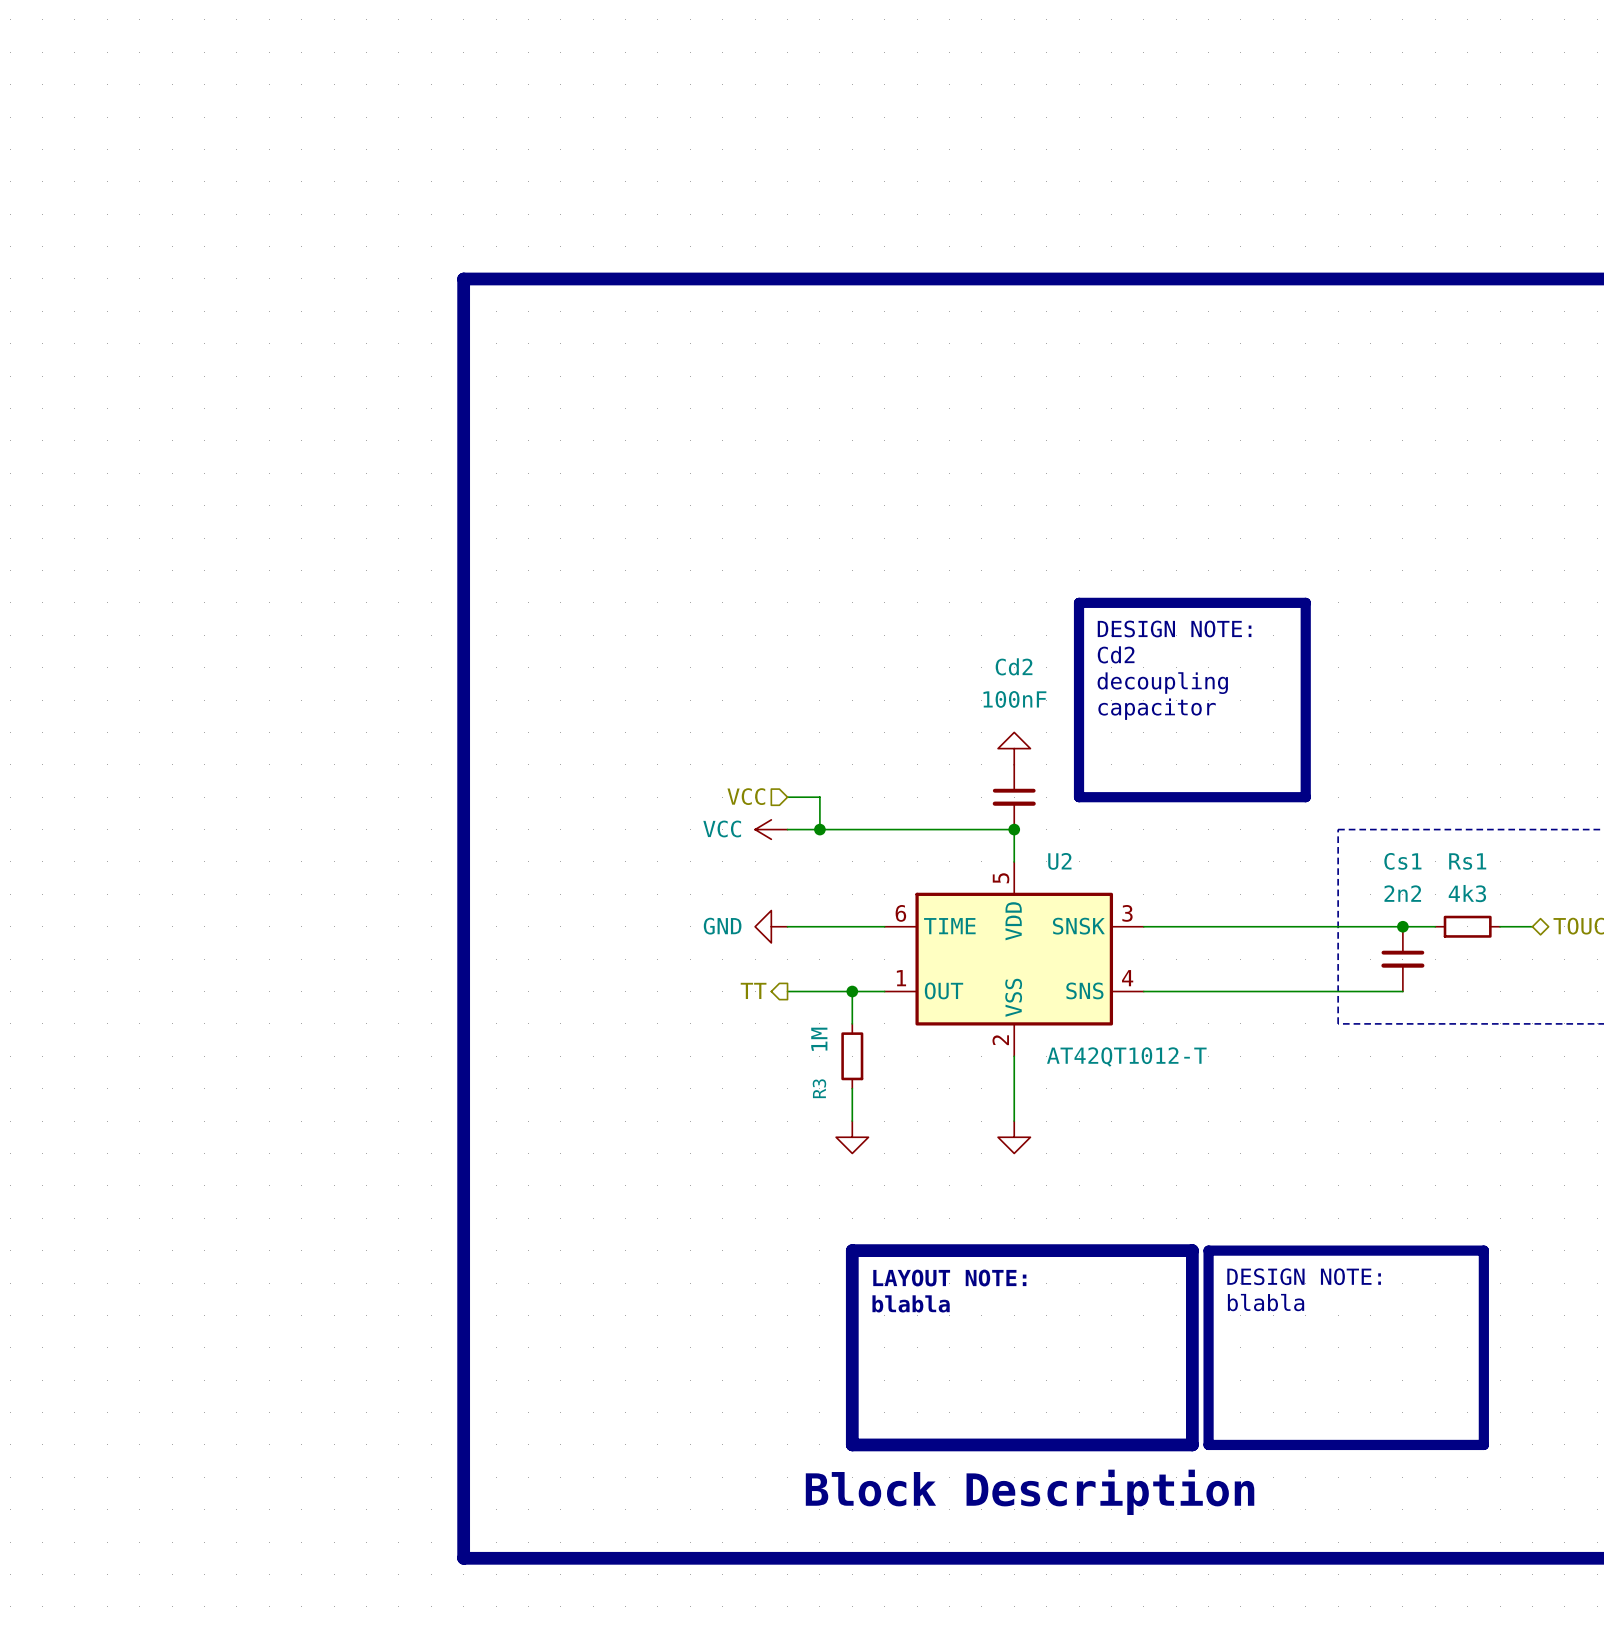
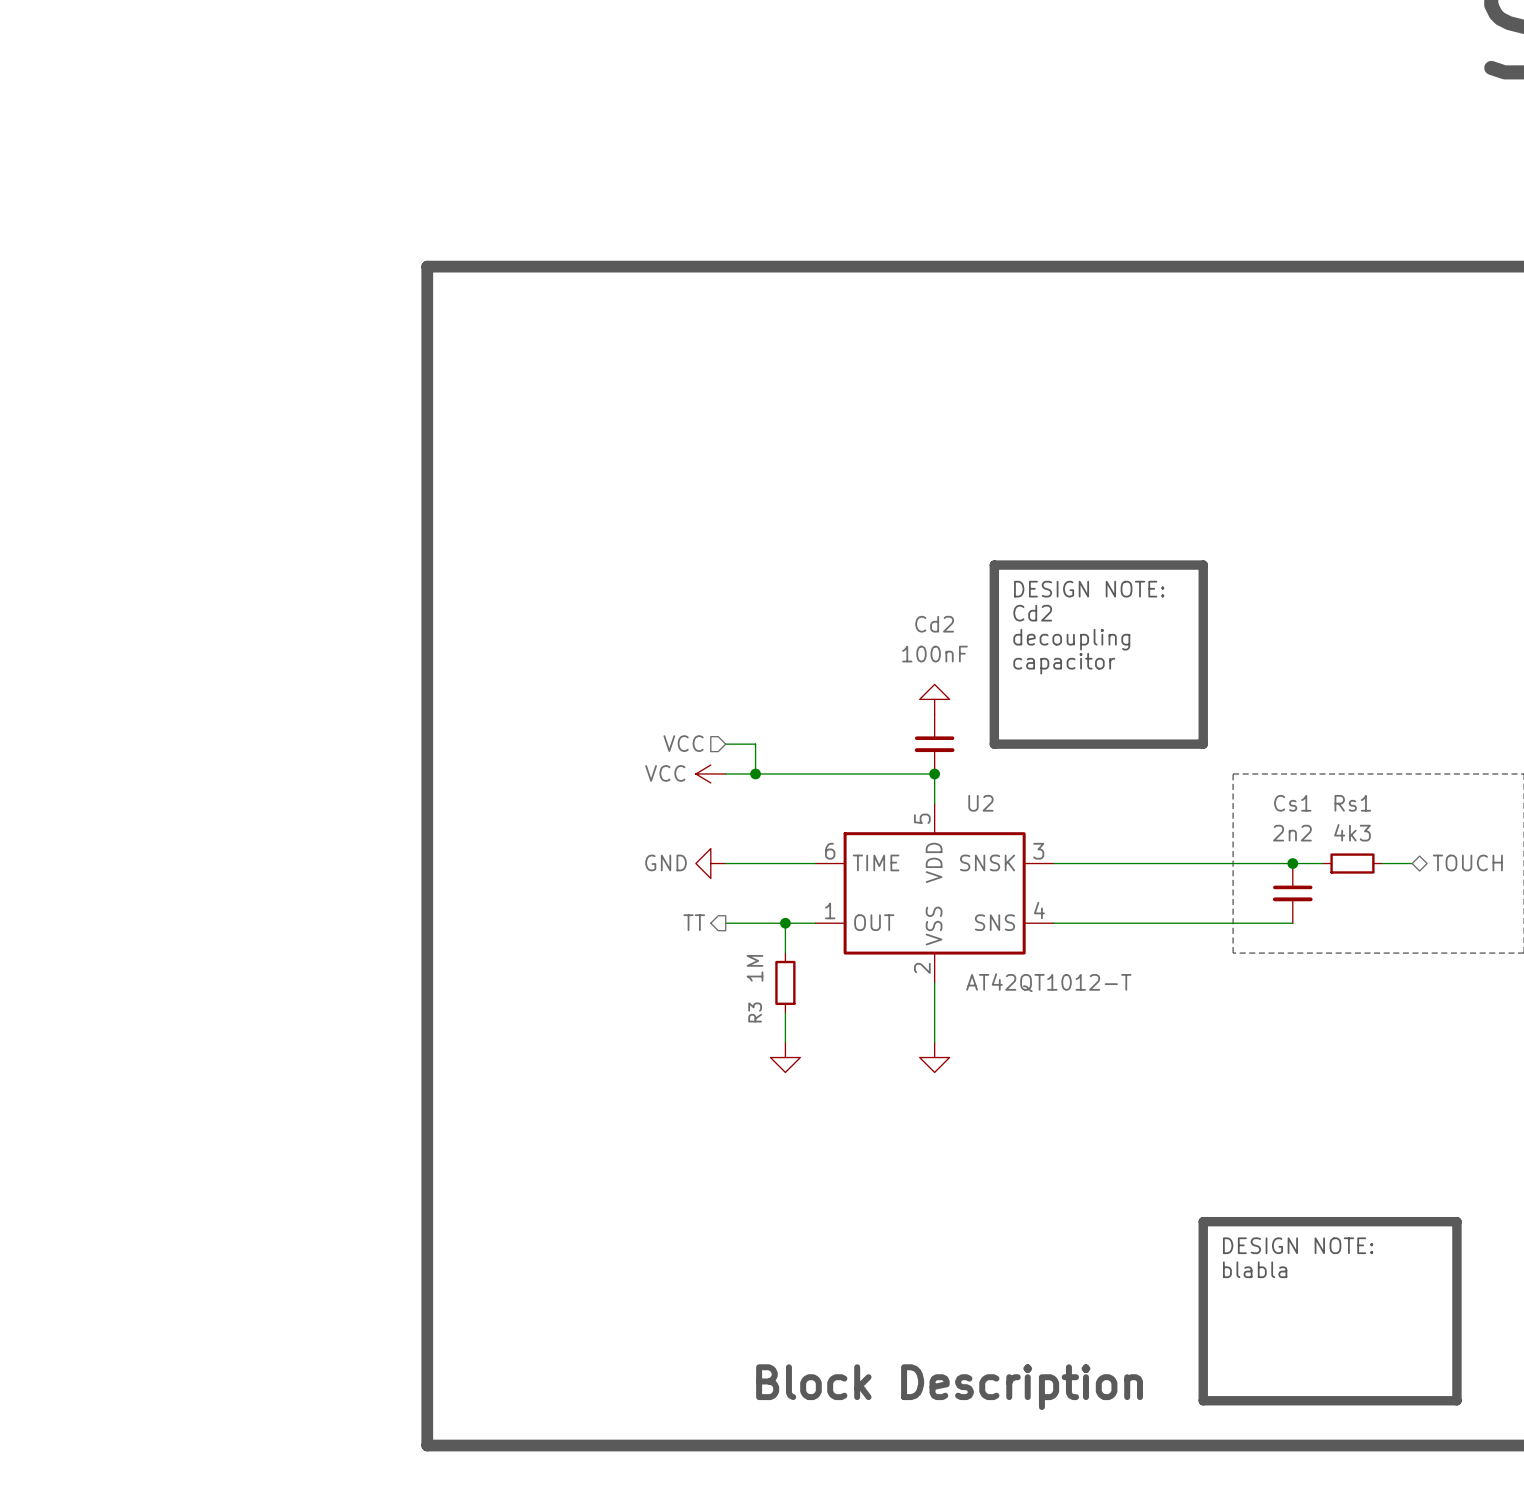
line: (852, 1250) (1192, 1250) (1192, 1444) (852, 1444) (852, 1250) -> none
line: (1208, 1250) (1483, 1250) (1483, 1444) (1208, 1444) (1208, 1250) -> (1203, 1221) (1456, 1221) (1456, 1400) (1203, 1400) (1203, 1221)
text position: DESIGN NOTE: (1304, 1276) -> DESIGN NOTE: (1298, 1245)
text: LAYOUT NOTE: (949, 1278) -> none
text position: blabla (1266, 1302) -> blabla (1255, 1269)
text: blabla (911, 1303) -> none

